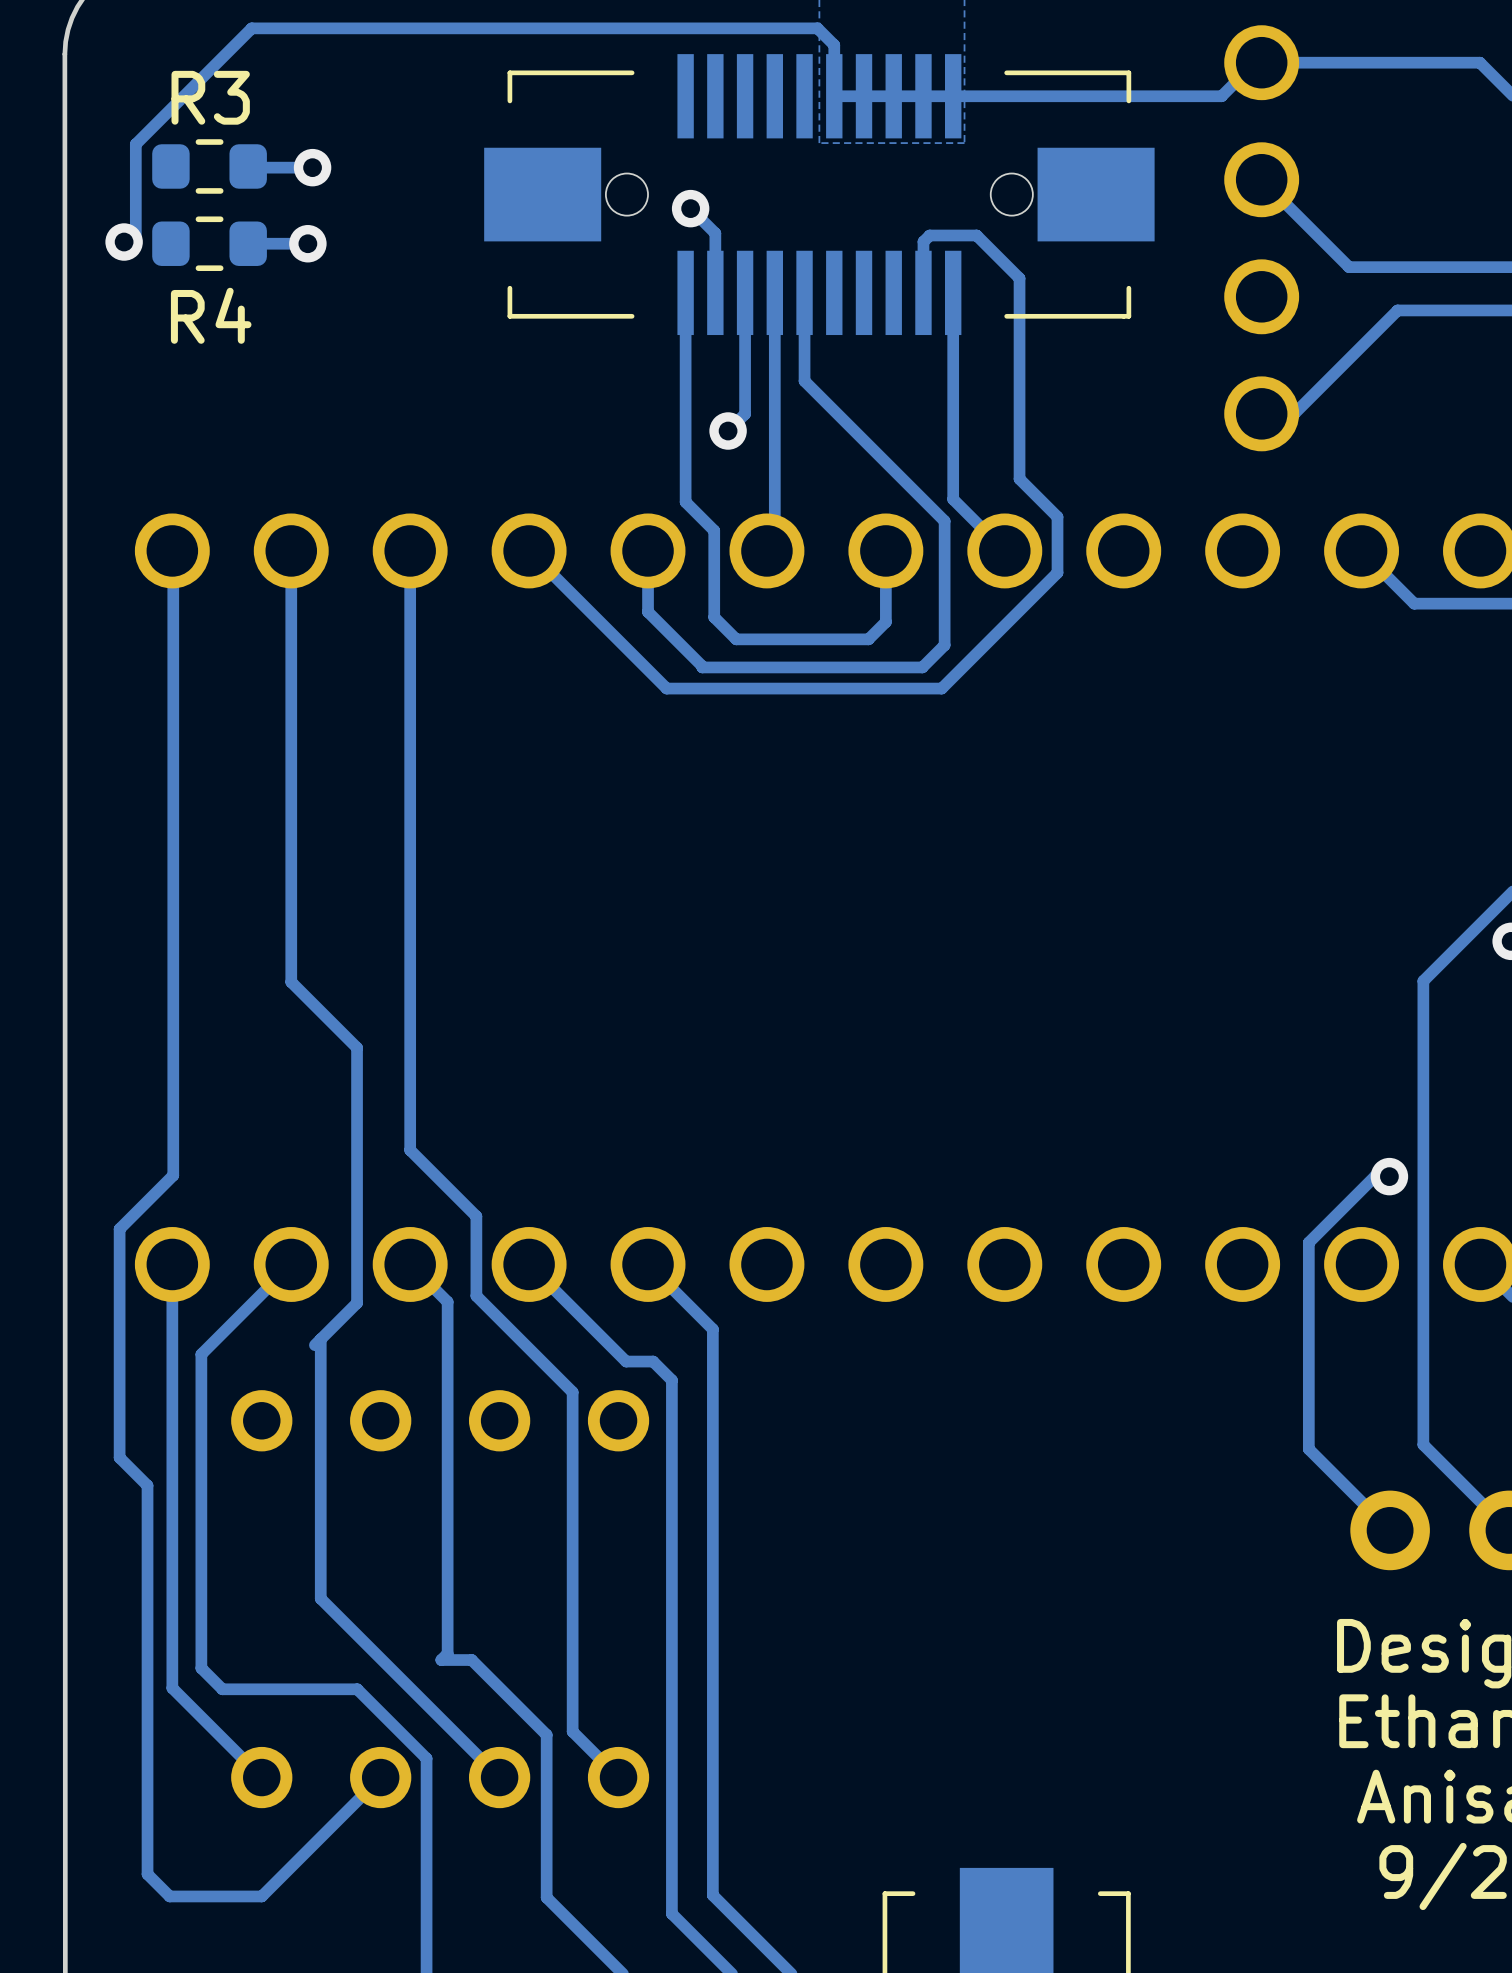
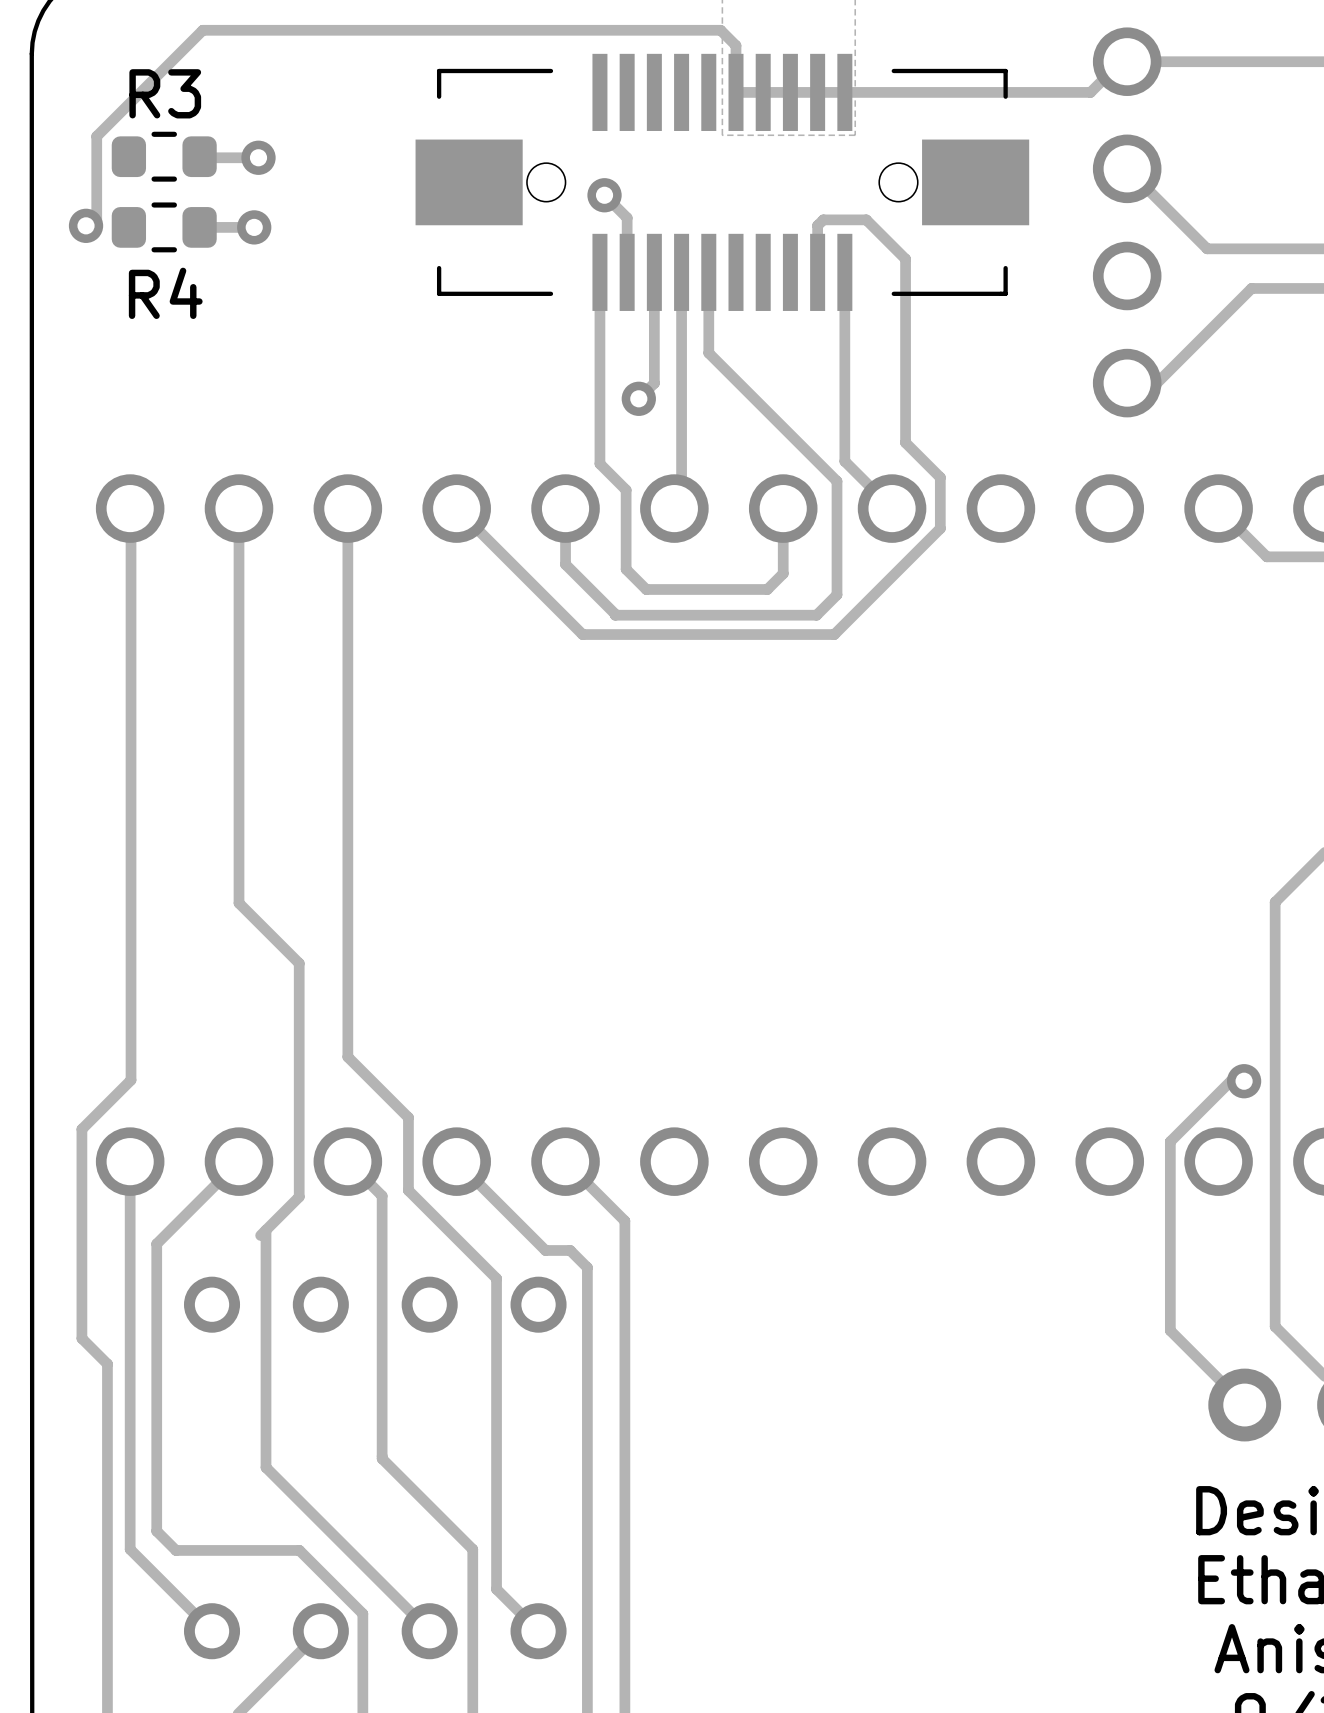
track: (447, 1589) (447, 1653) (441, 1660) (471, 1660) (546, 1734) -> (382, 1458) (472, 1549) (472, 1592)

